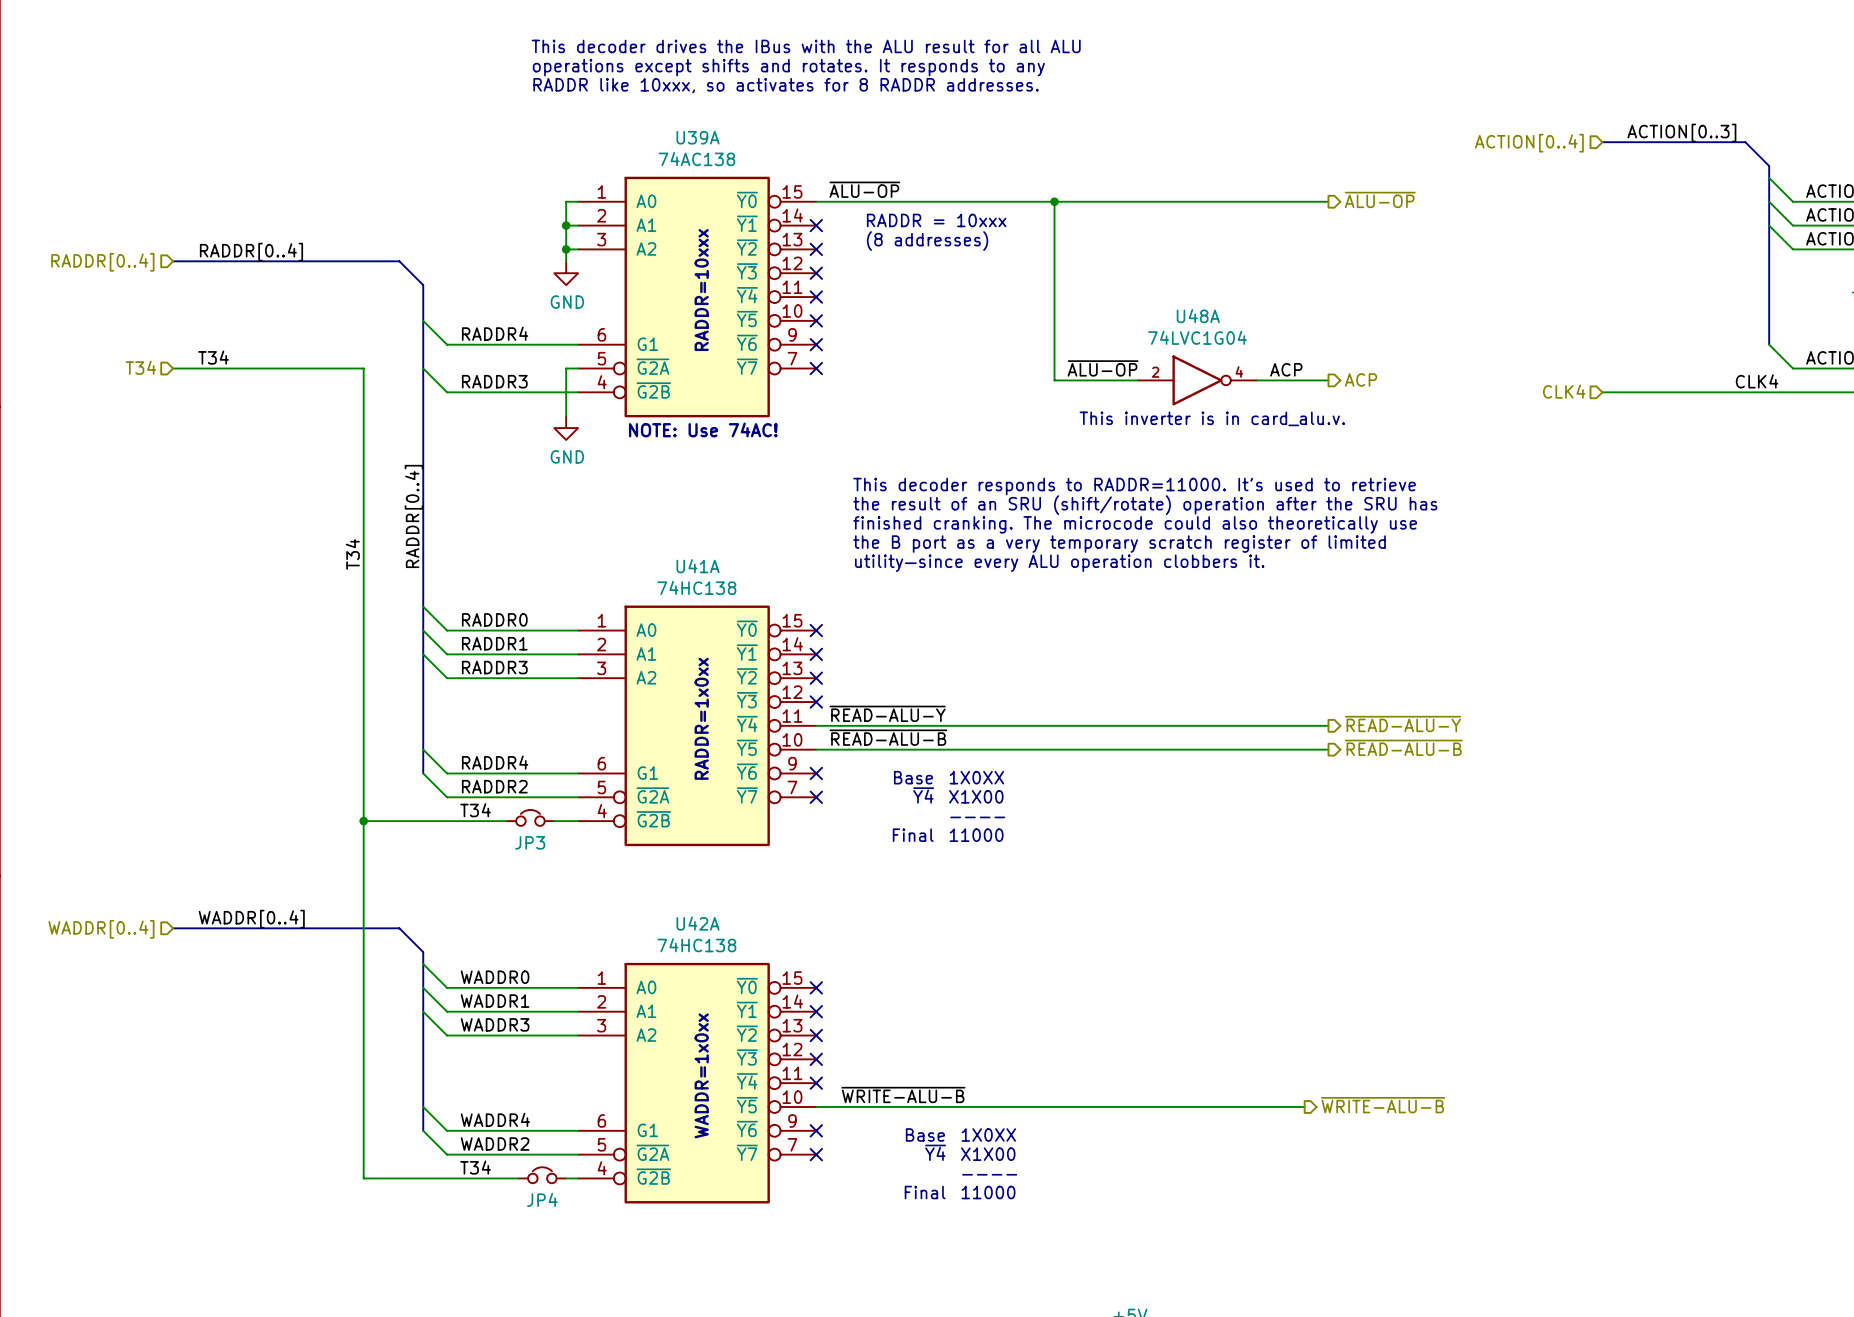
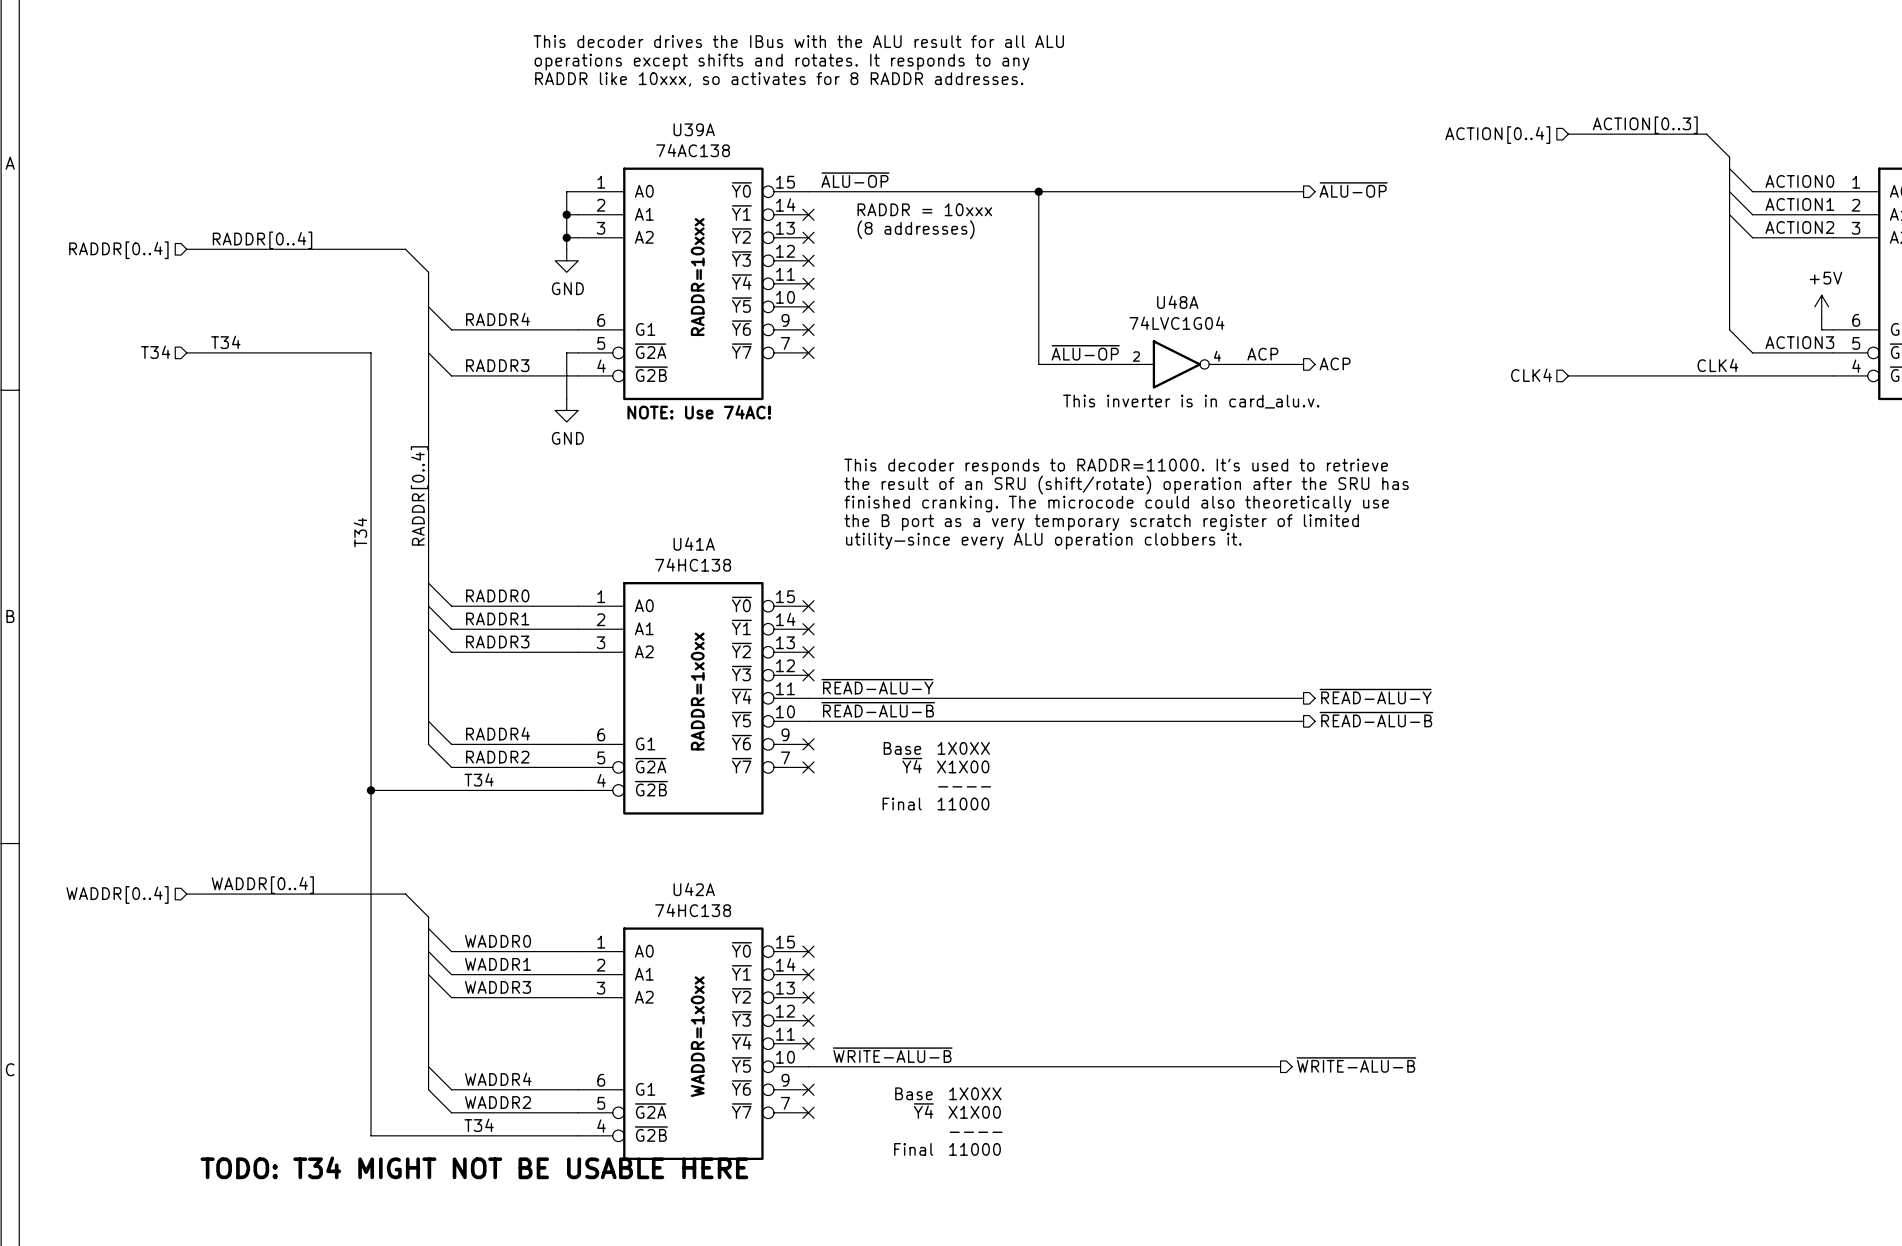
JP3: (530, 817) -> none
wire: none -> (509, 790) (555, 790)
JP4: (542, 1175) -> none
wire: none -> (520, 1135) (566, 1135)
text: none -> TODO: T34 MIGHT NOT BE USABLE HERE (474, 1167)

